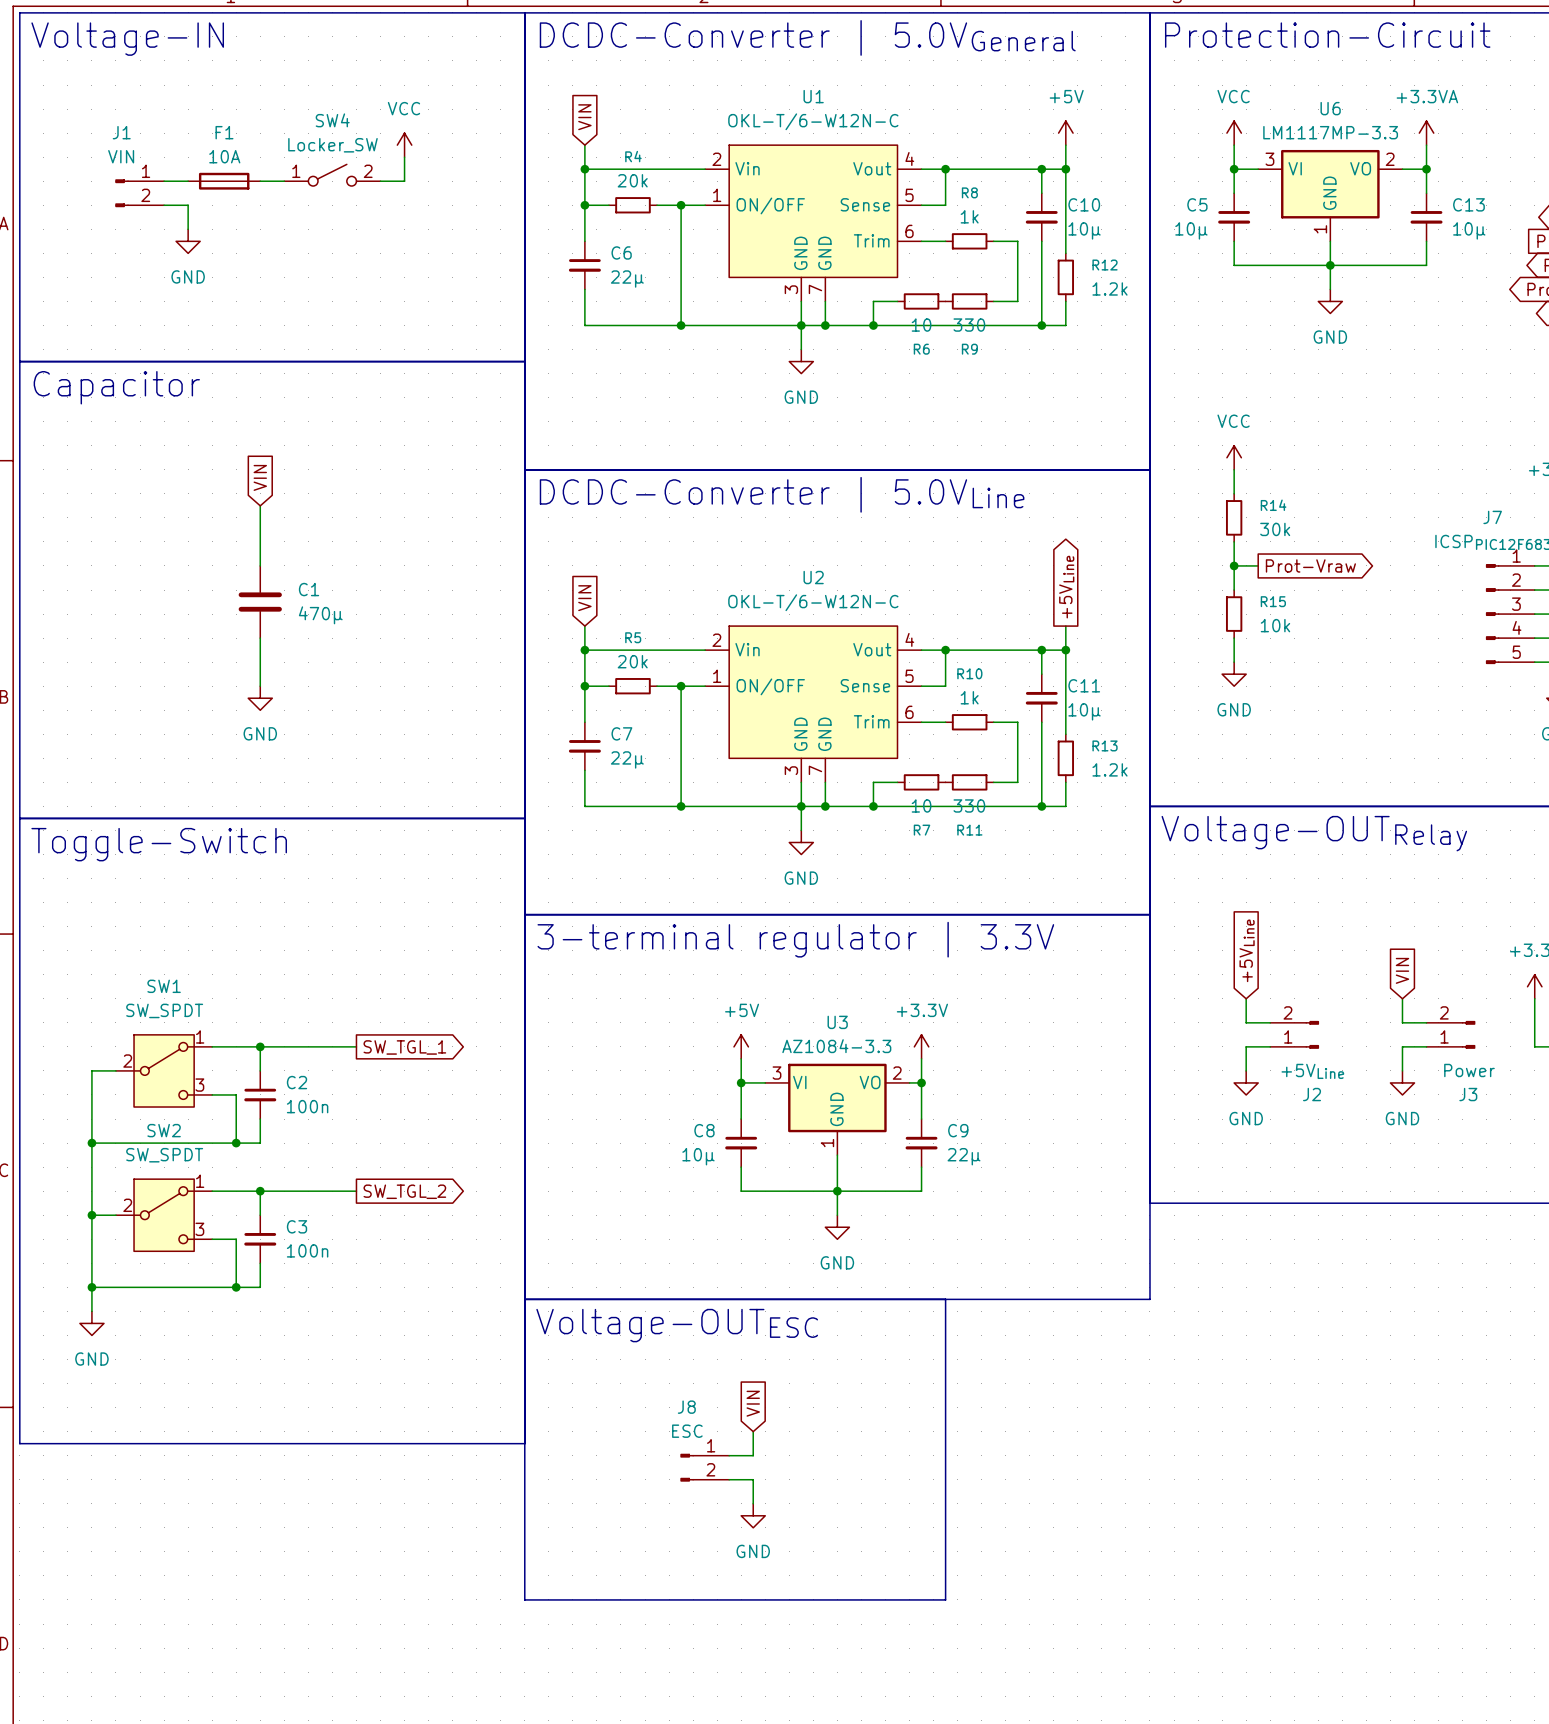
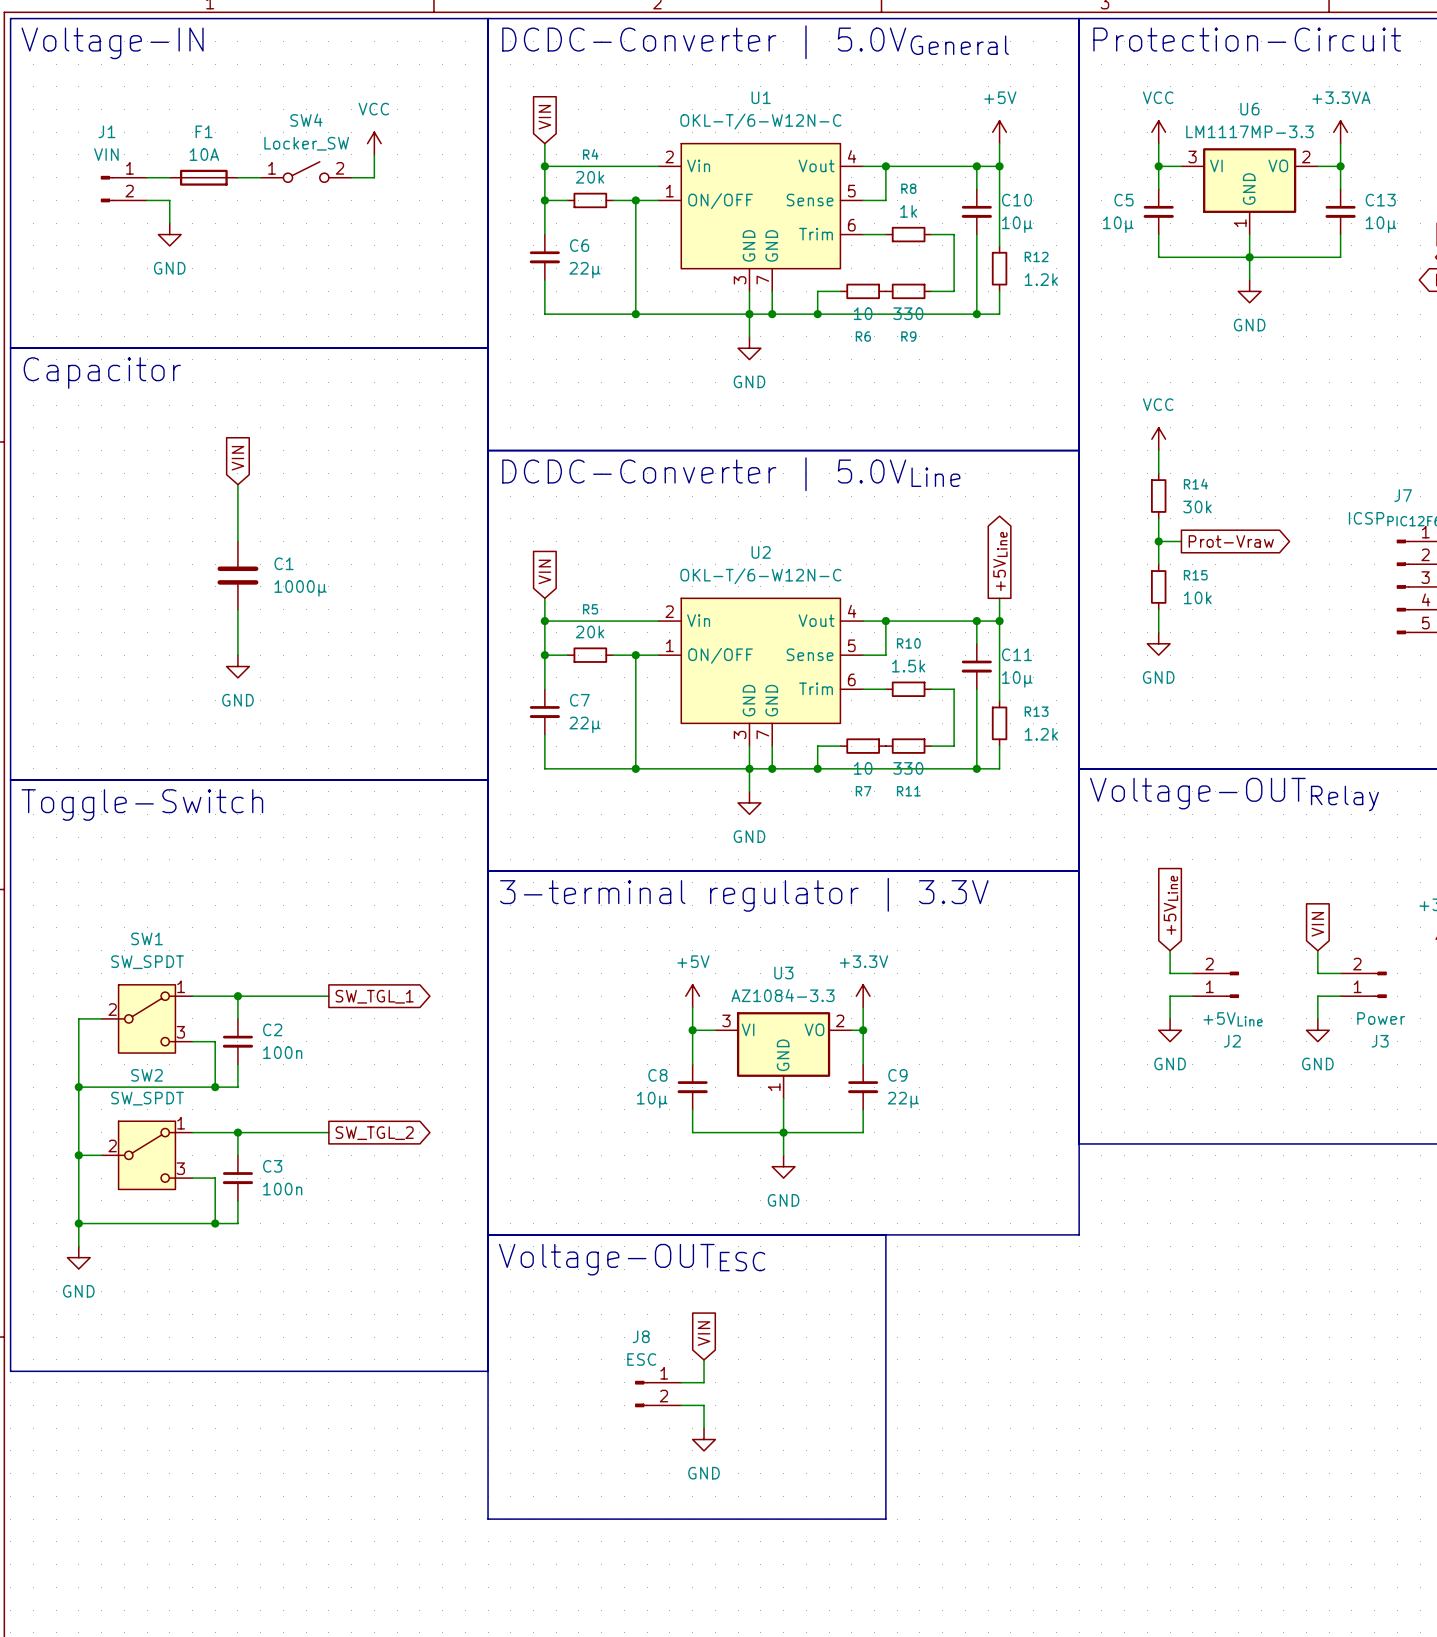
C1 value: 470μ (320, 615) -> 1000μ (300, 588)
R10 value: 1k (969, 697) -> 1.5k (908, 666)

